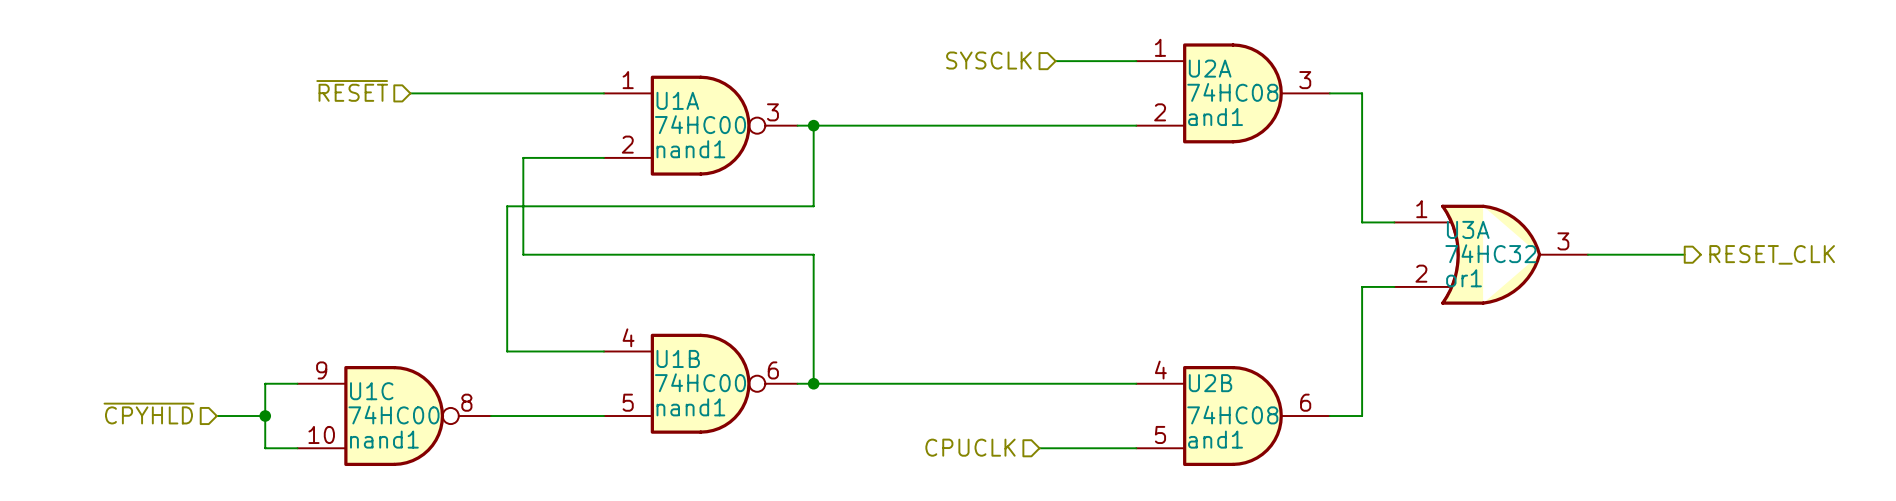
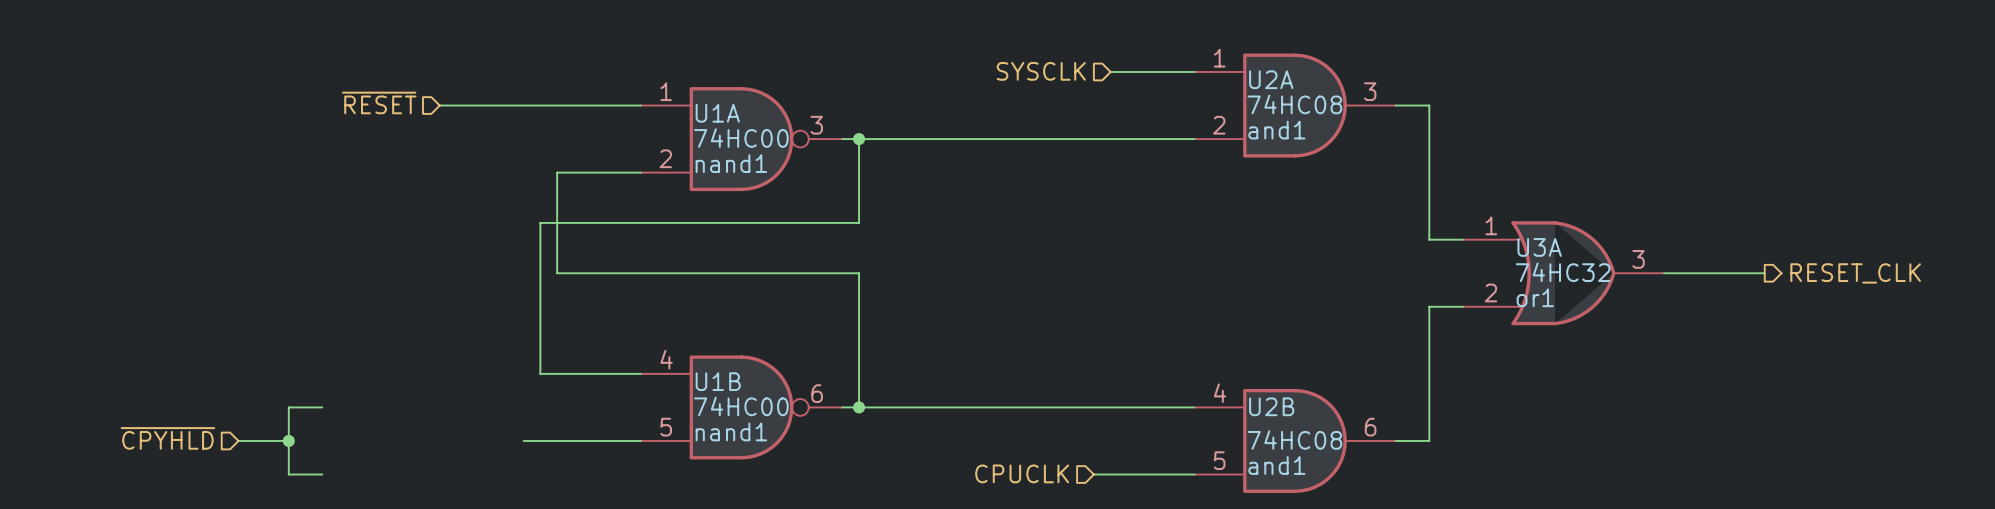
U1C: 74HC00 (394, 416) -> none

